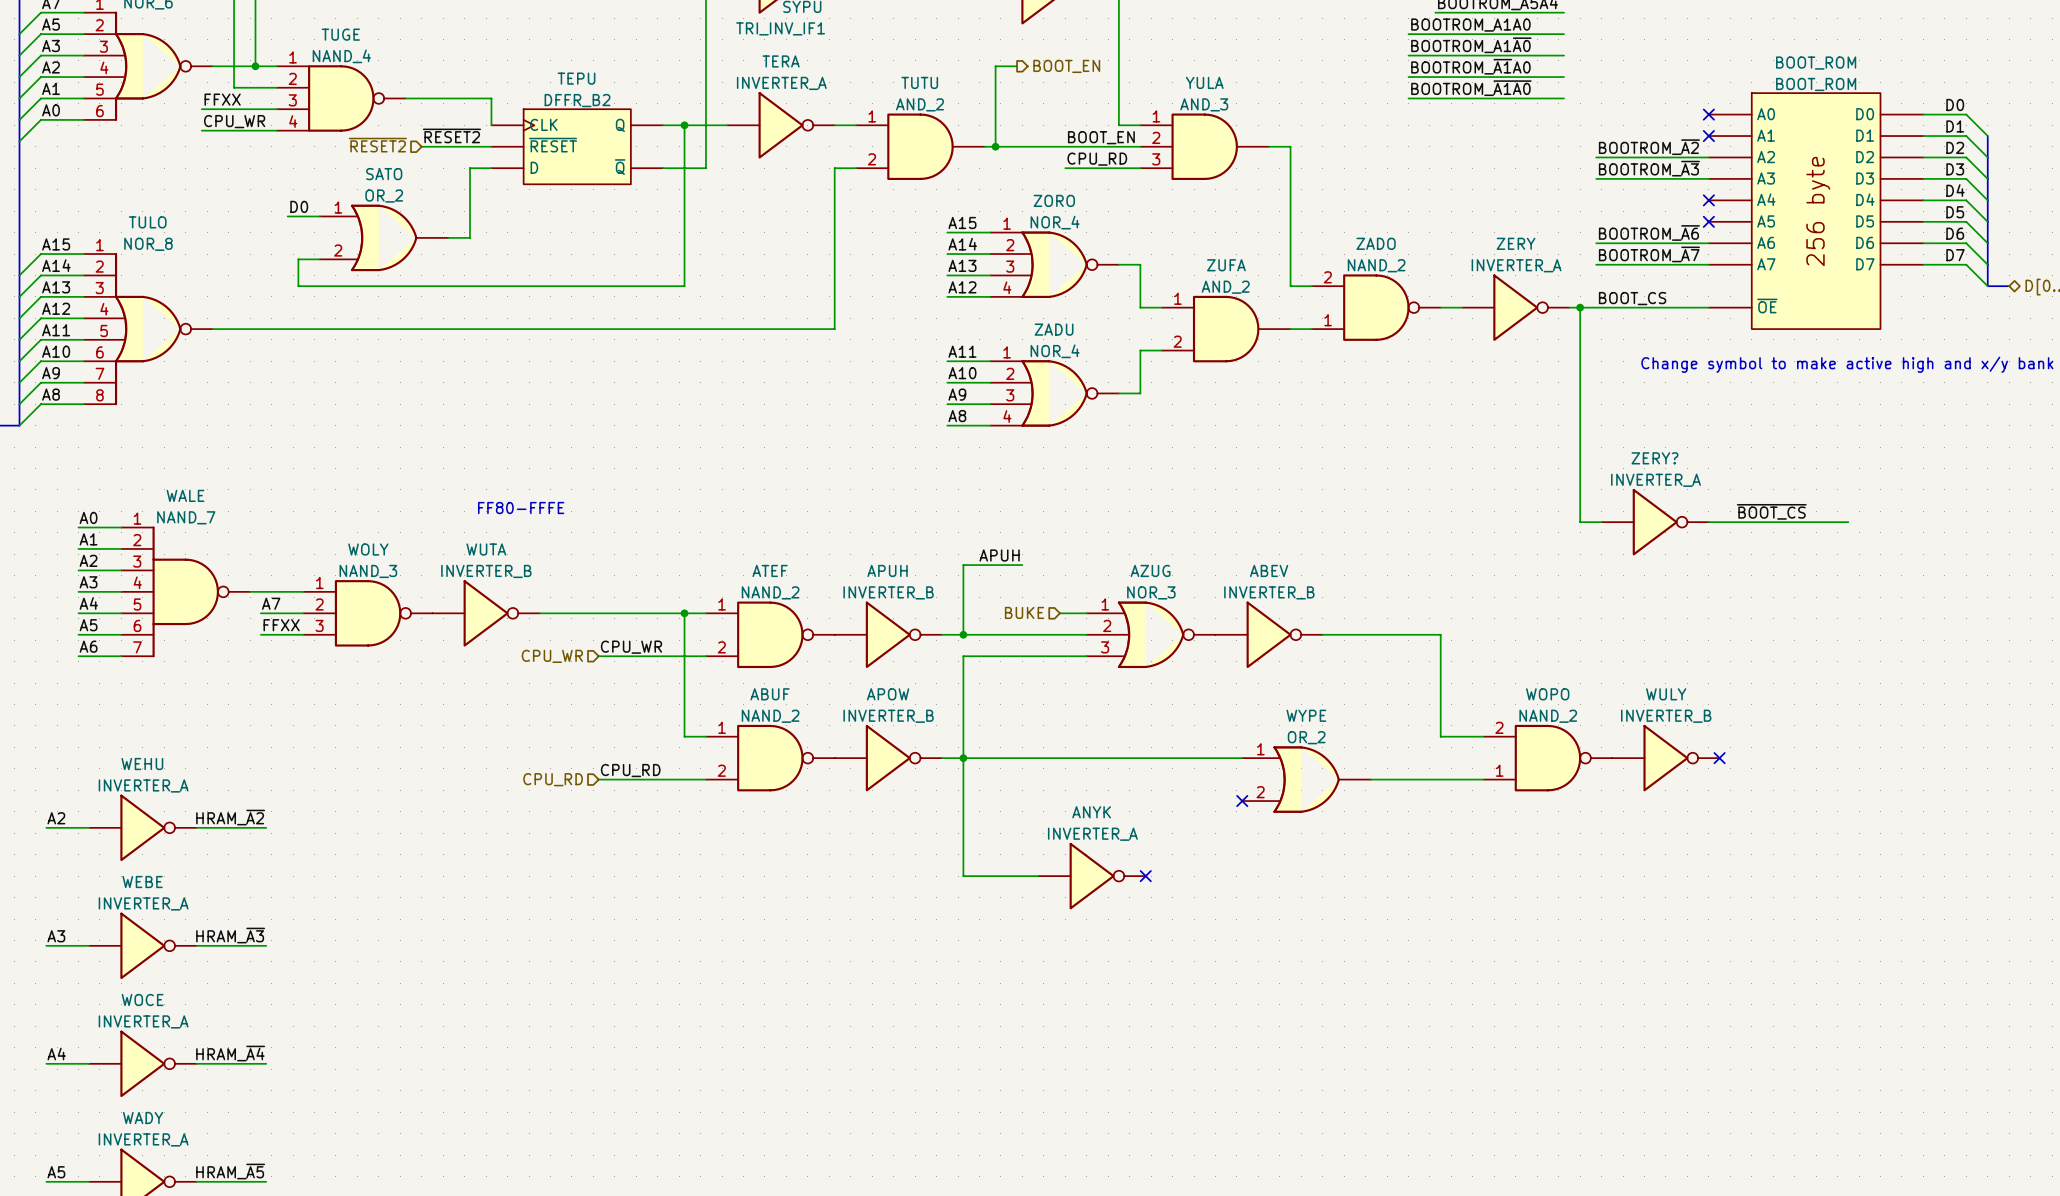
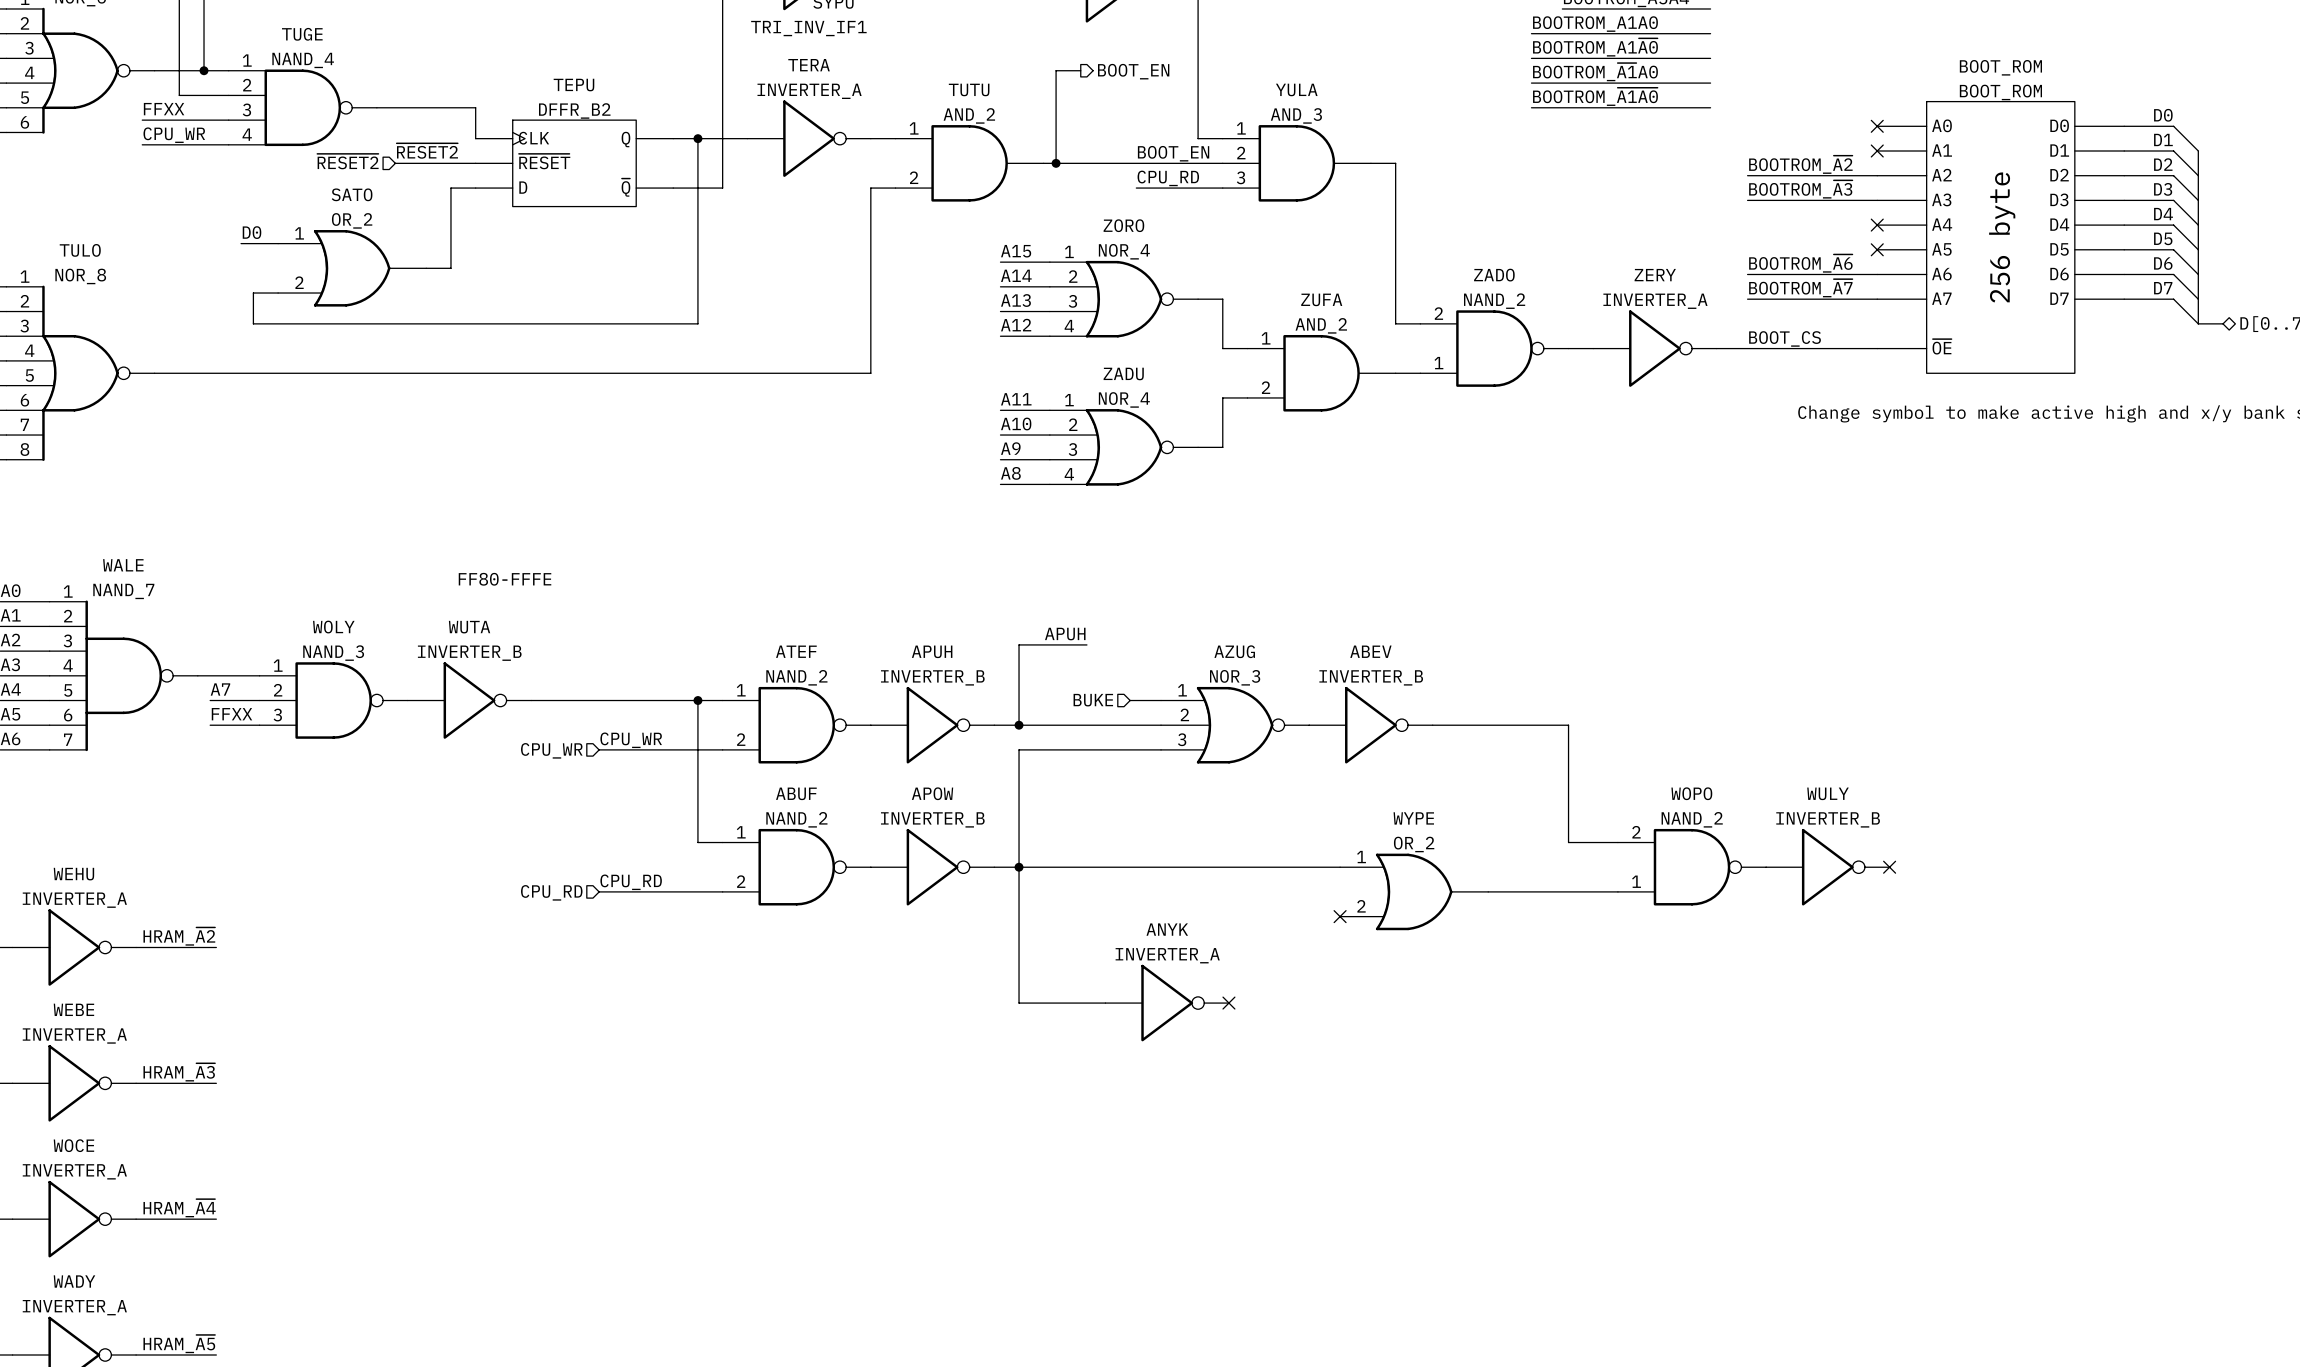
wire: (1580, 307) (1580, 522) (1601, 522) -> none
junction: (1580, 307) -> none
label: ~{BOOT_CS} (1771, 511) -> none
ZERY?: INVERTER_A (1655, 522) -> none
wire: (1708, 522) (1848, 522) -> none

